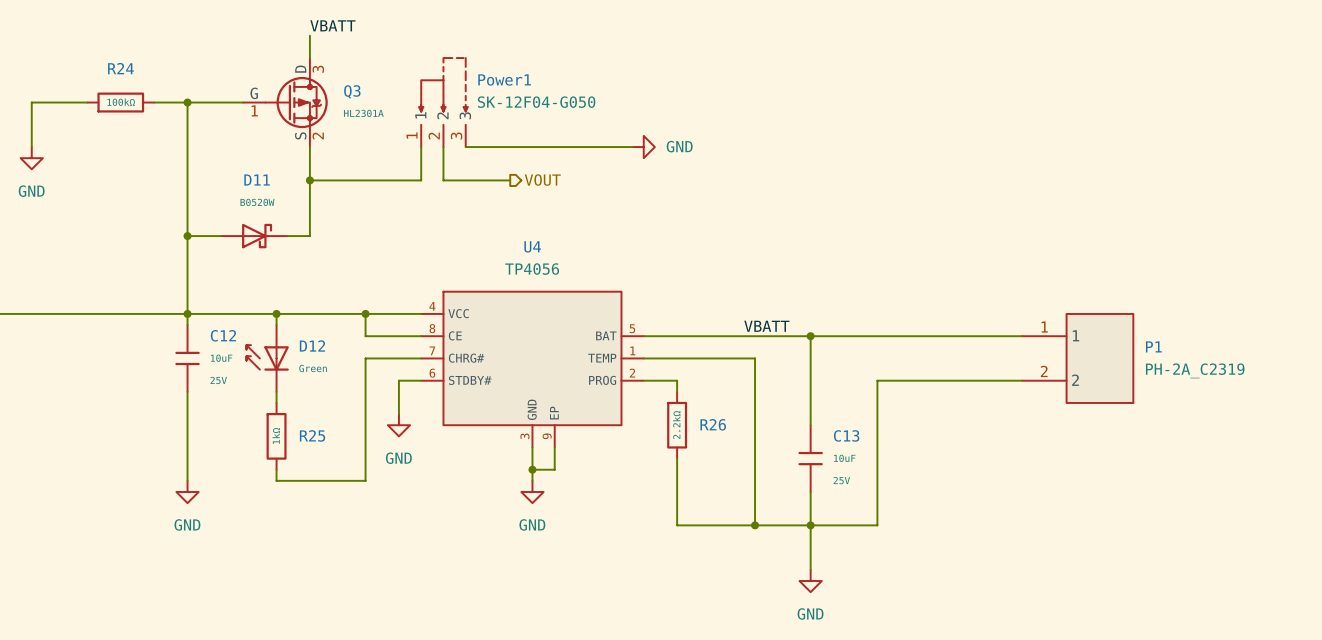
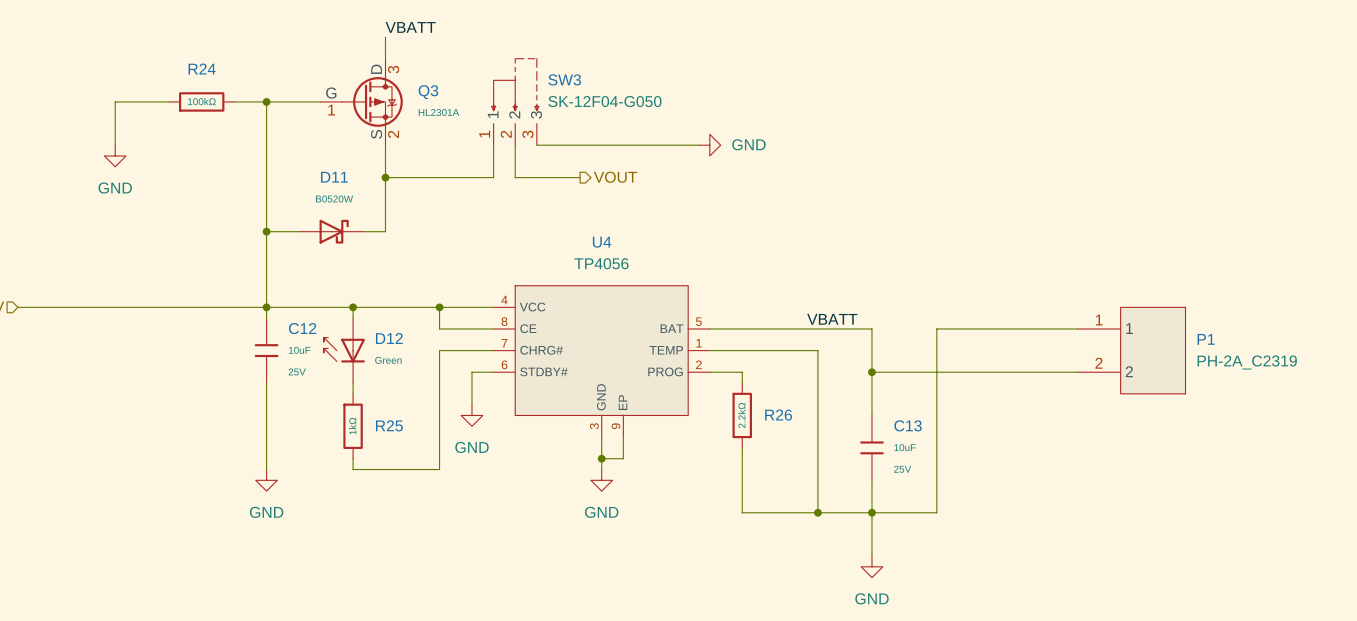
Power1 name: Power1 (504, 79) -> SW3 (564, 79)
wire: (810, 336) (877, 336) -> (871, 372) (936, 372) (936, 328)
junction position: (810, 336) -> (871, 372)

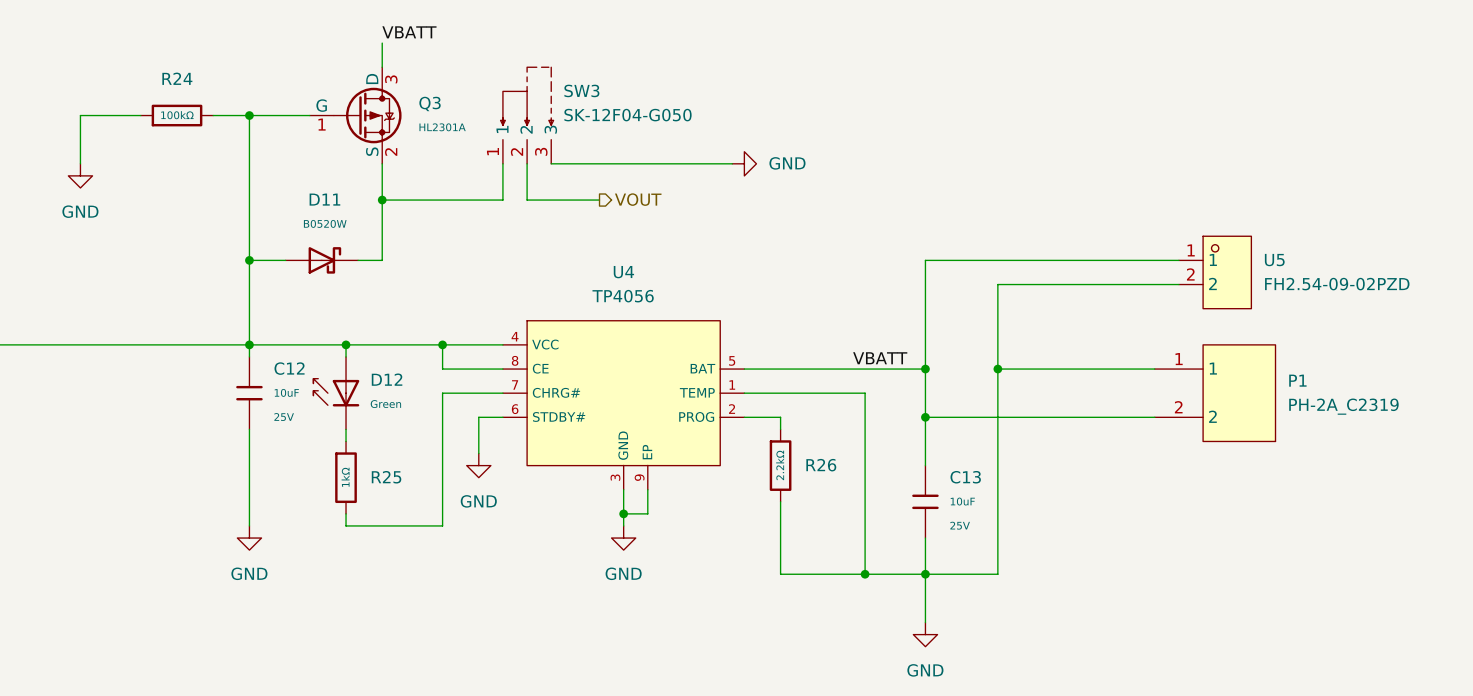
wire: none -> (1178, 260) (925, 260) (925, 369)
U5: none -> FH2.54-09-02PZD (1215, 272)
wire: none -> (1178, 284) (997, 284) (997, 369)
junction: none -> (925, 369)
junction: none -> (997, 369)

